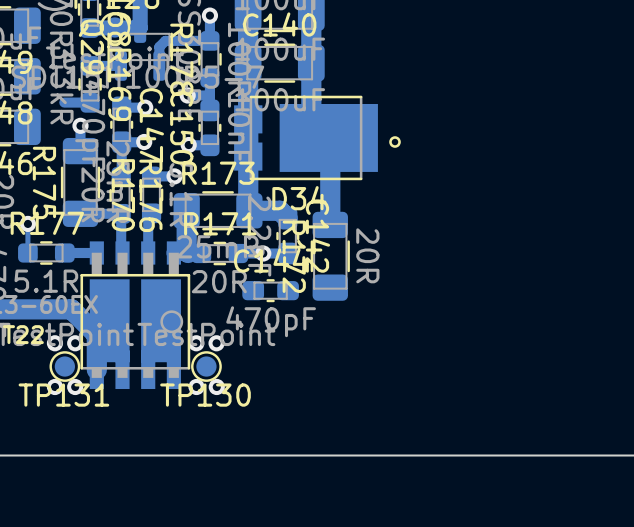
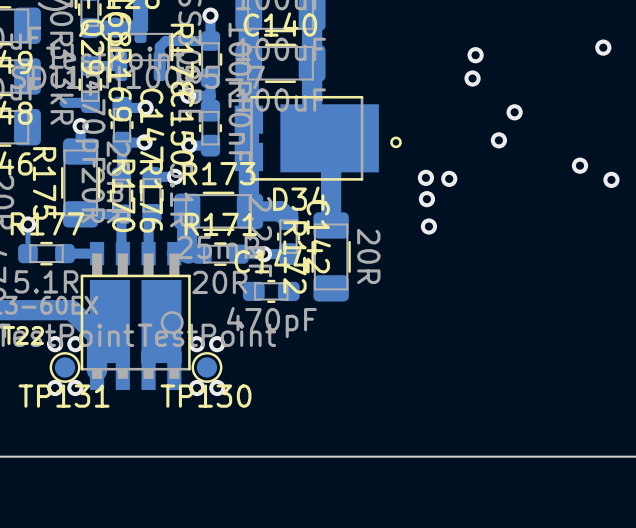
via: none -> (603, 47)
via: none -> (475, 55)
via: none -> (472, 78)
via: none -> (514, 112)
via: none -> (498, 140)
via: none -> (580, 165)
via: none -> (425, 177)
via: none -> (449, 178)
via: none -> (611, 179)
via: none -> (426, 199)
via: none -> (428, 226)

